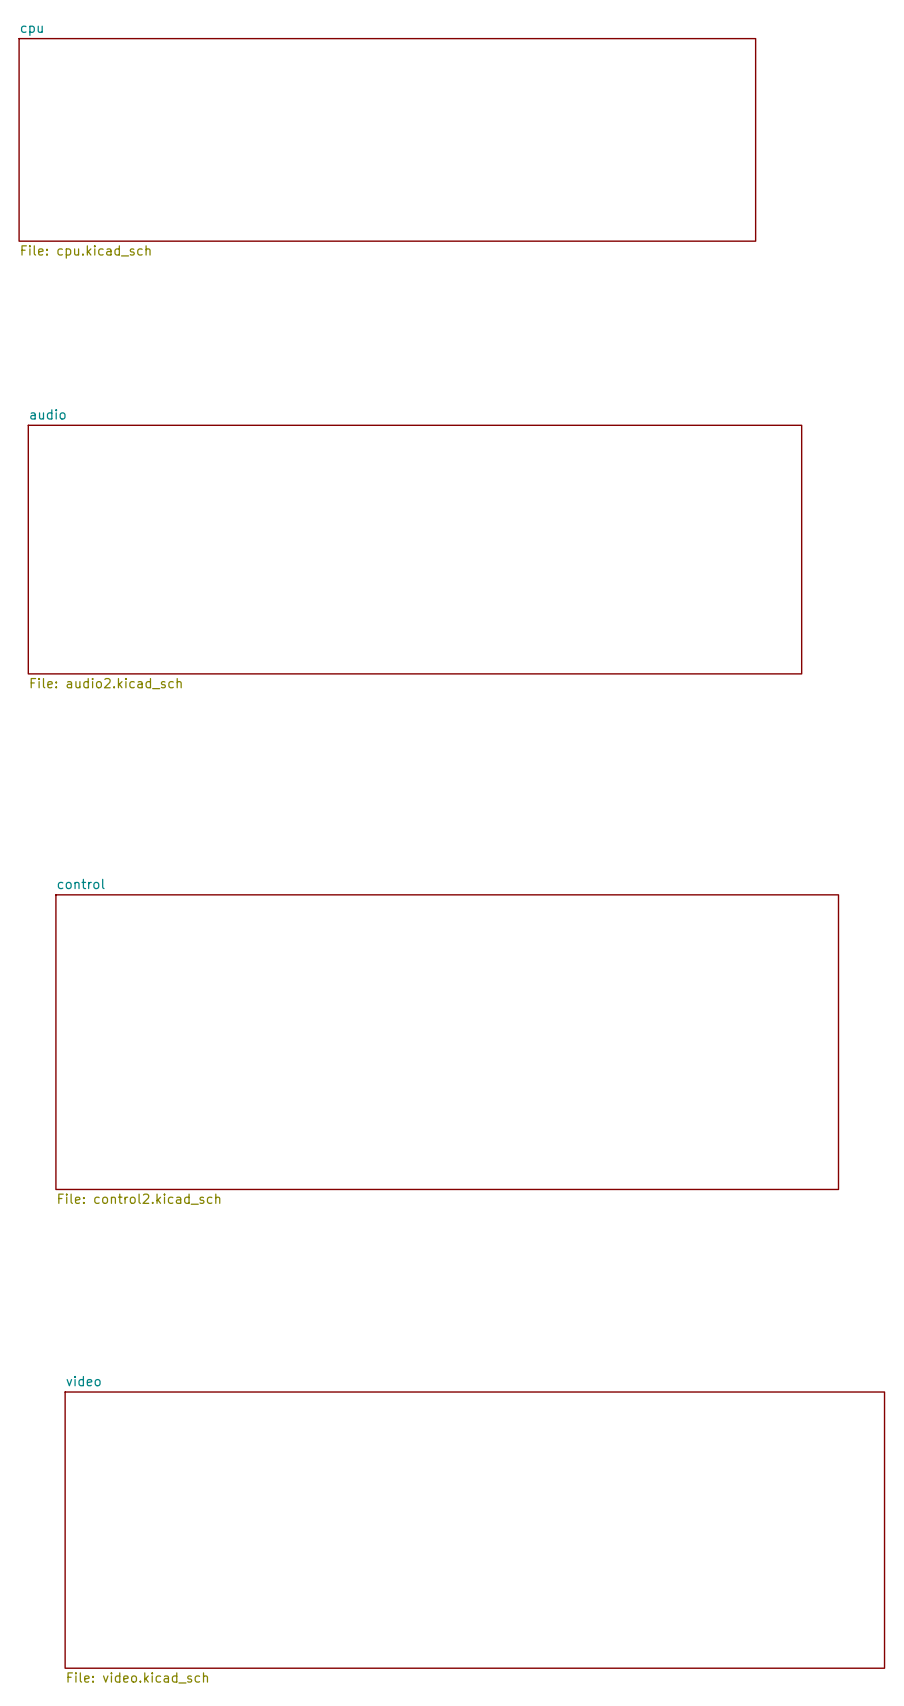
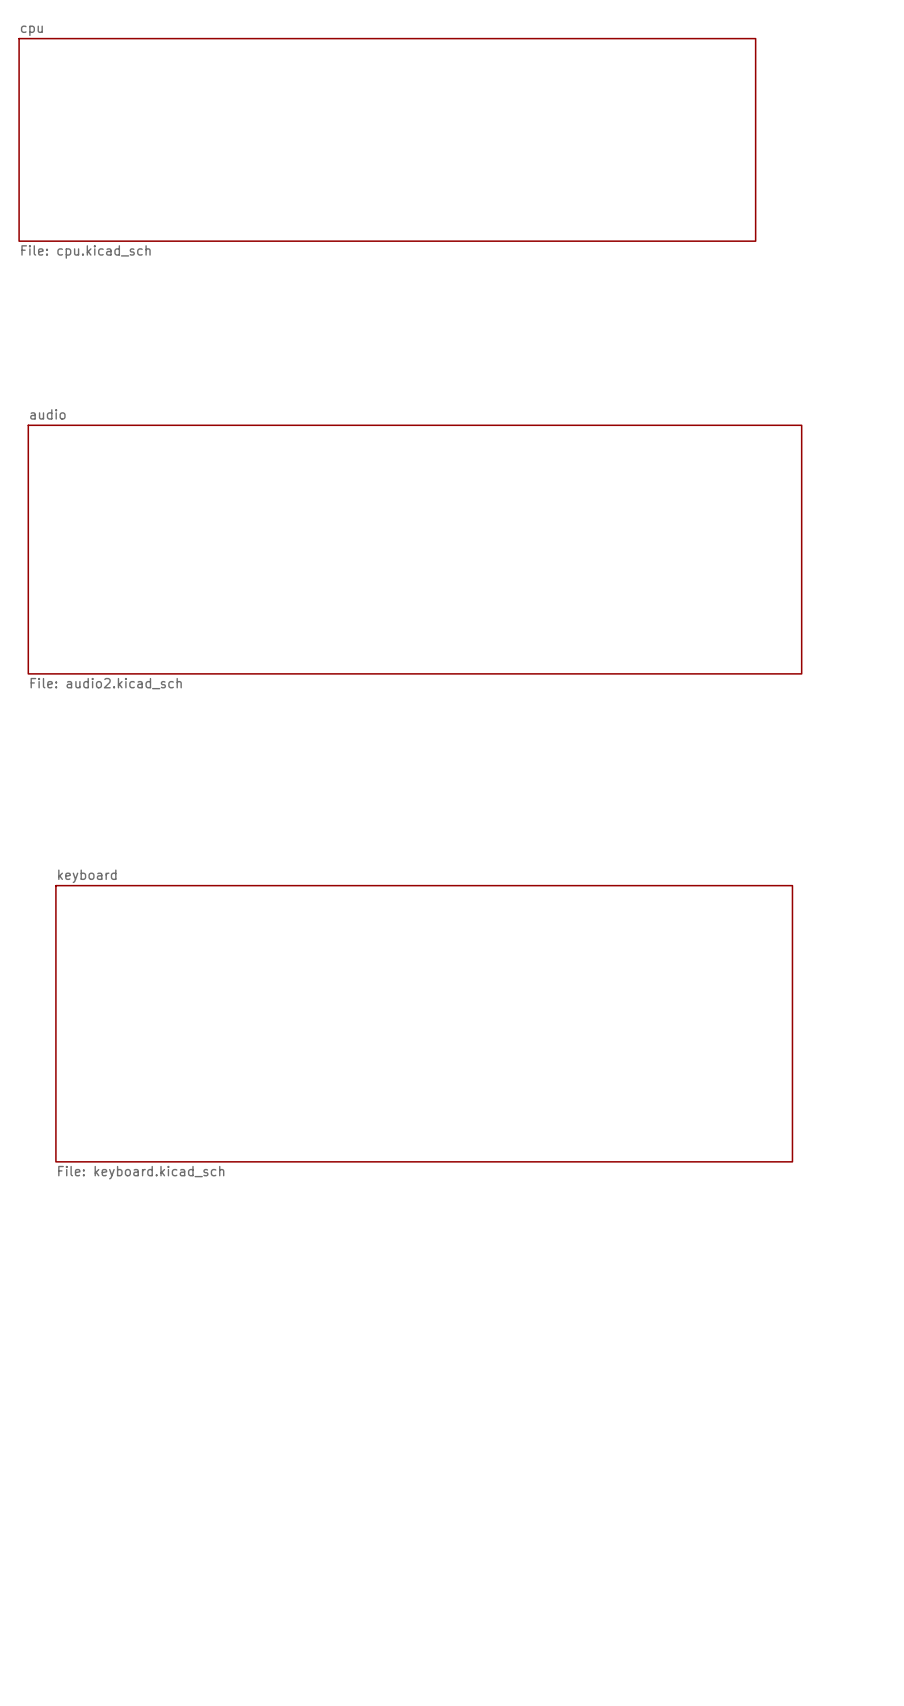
sheet keyboard: none -> File: keyboard.kicad_sch (424, 1023)
sheet control: File: control2.kicad_sch (447, 1042) -> none
sheet video: File: video.kicad_sch (474, 1530) -> none

